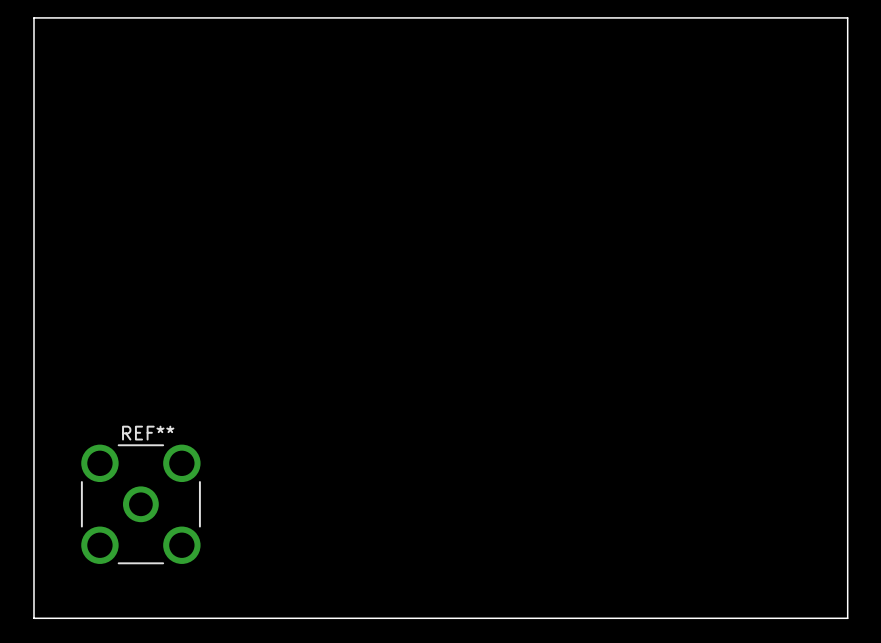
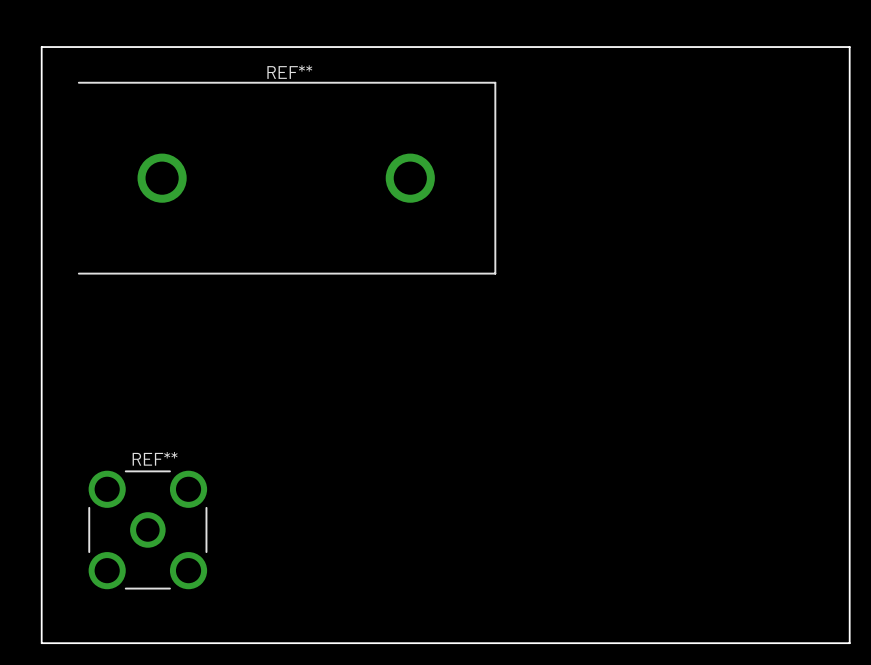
REF**: none -> (287, 178)

